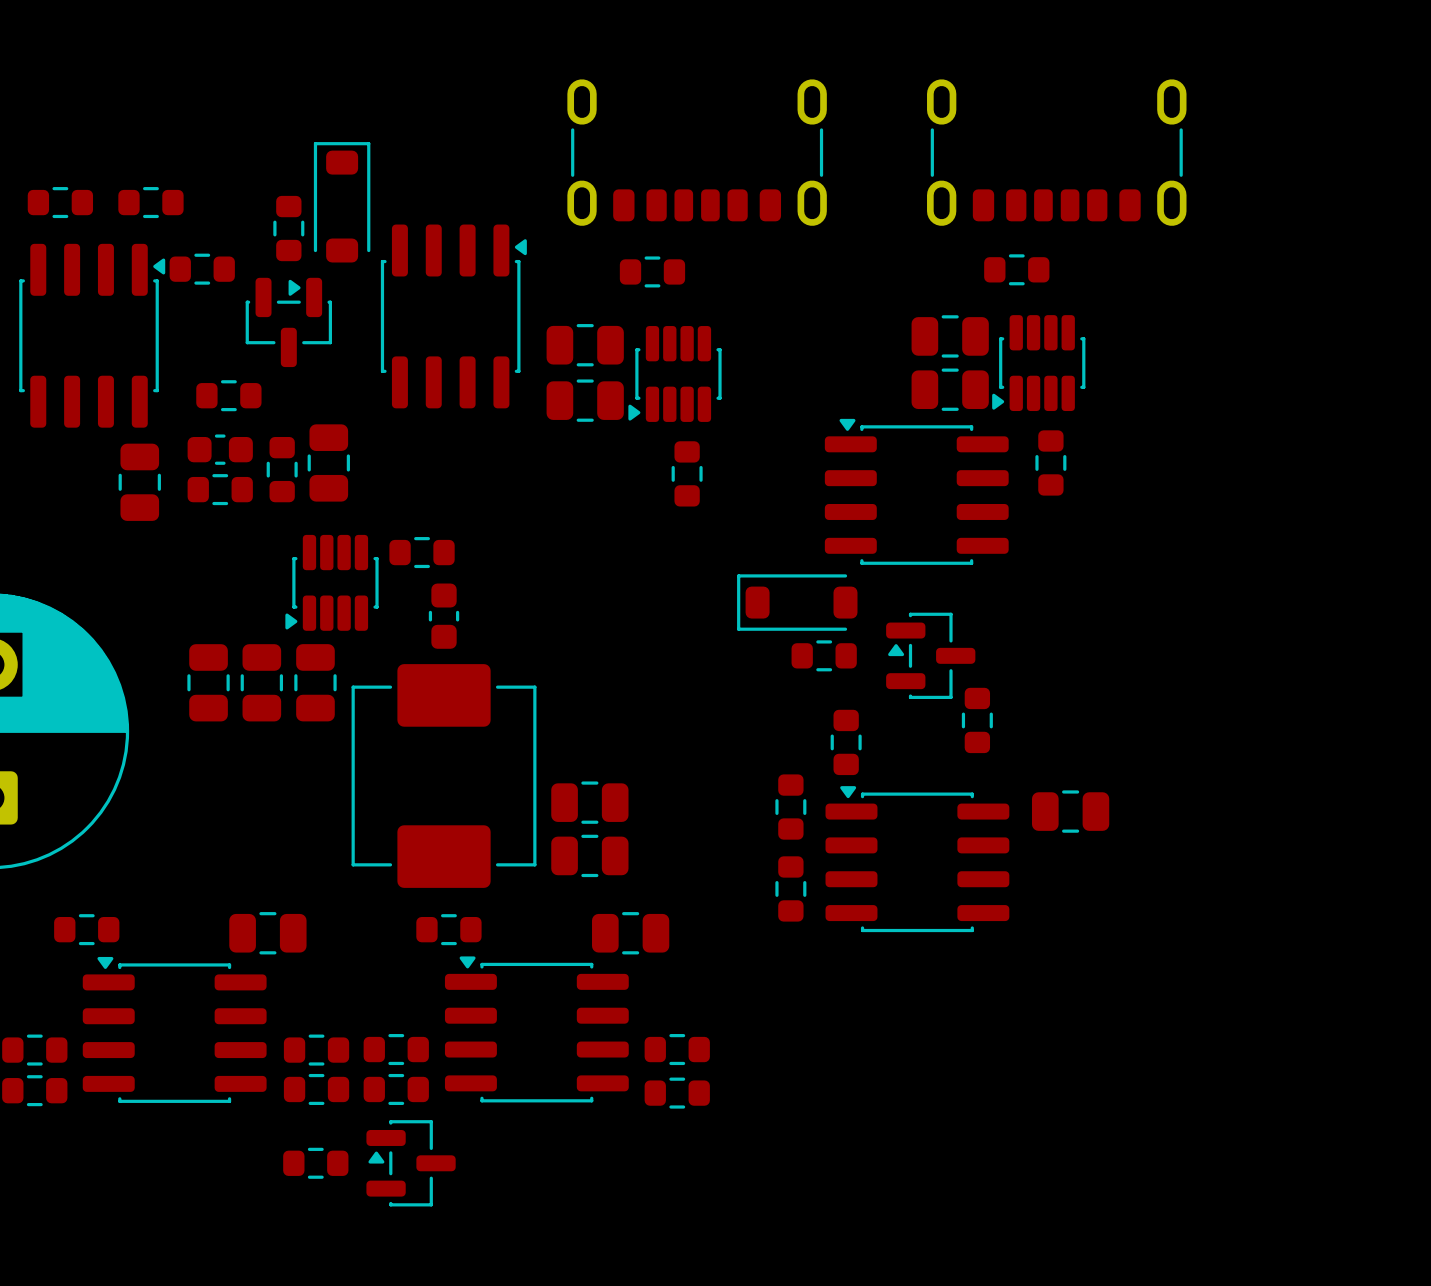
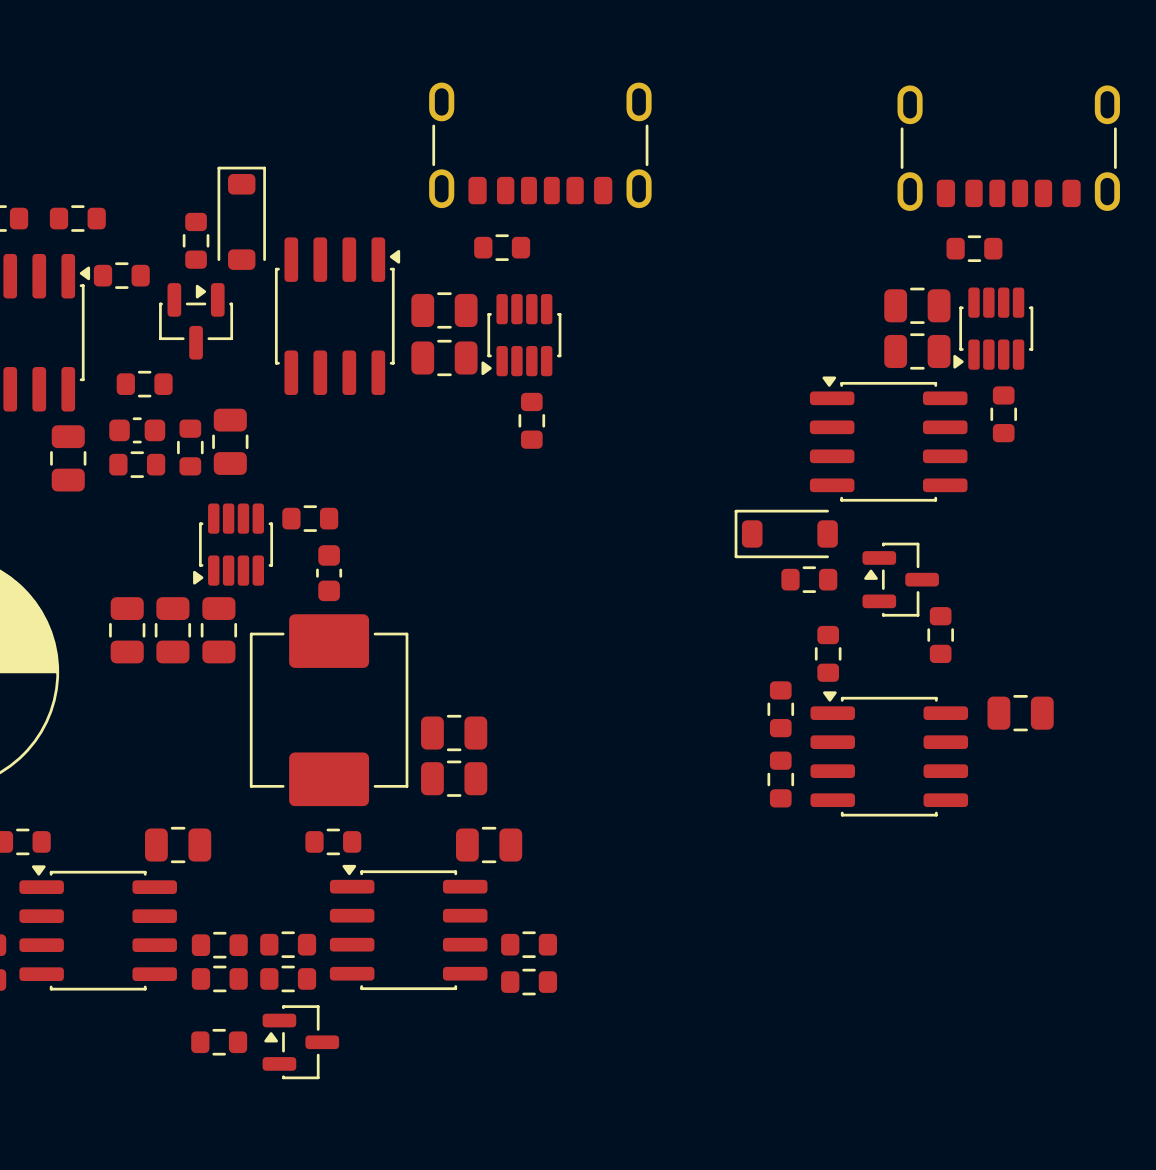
part position: (697, 152) -> (540, 145)
part position: (1056, 152) -> (1008, 148)
part: none -> (974, 248)
part: (1016, 269) -> none
part position: (652, 271) -> (502, 247)
part: none -> (917, 305)
part: none -> (444, 310)
part: (950, 336) -> none
part: (585, 345) -> none
part: none -> (917, 351)
part position: (1038, 363) -> (993, 328)
part: none -> (444, 357)
part position: (674, 373) -> (521, 335)
part: (950, 389) -> none
part: (585, 400) -> none
part: none -> (1003, 414)
part: (1050, 462) -> none
part position: (687, 473) -> (531, 420)
part position: (916, 491) -> (888, 439)
part position: (797, 602) -> (786, 533)
part: none -> (809, 579)
part: (824, 655) -> none
part position: (930, 655) -> (900, 579)
part: none -> (940, 635)
part: none -> (828, 653)
part: (977, 720) -> none
part: (846, 742) -> none
part: none -> (780, 709)
part: (790, 807) -> none
part position: (1070, 811) -> (1020, 713)
part: none -> (780, 779)
part position: (917, 859) -> (889, 753)
part: (790, 888) -> none

